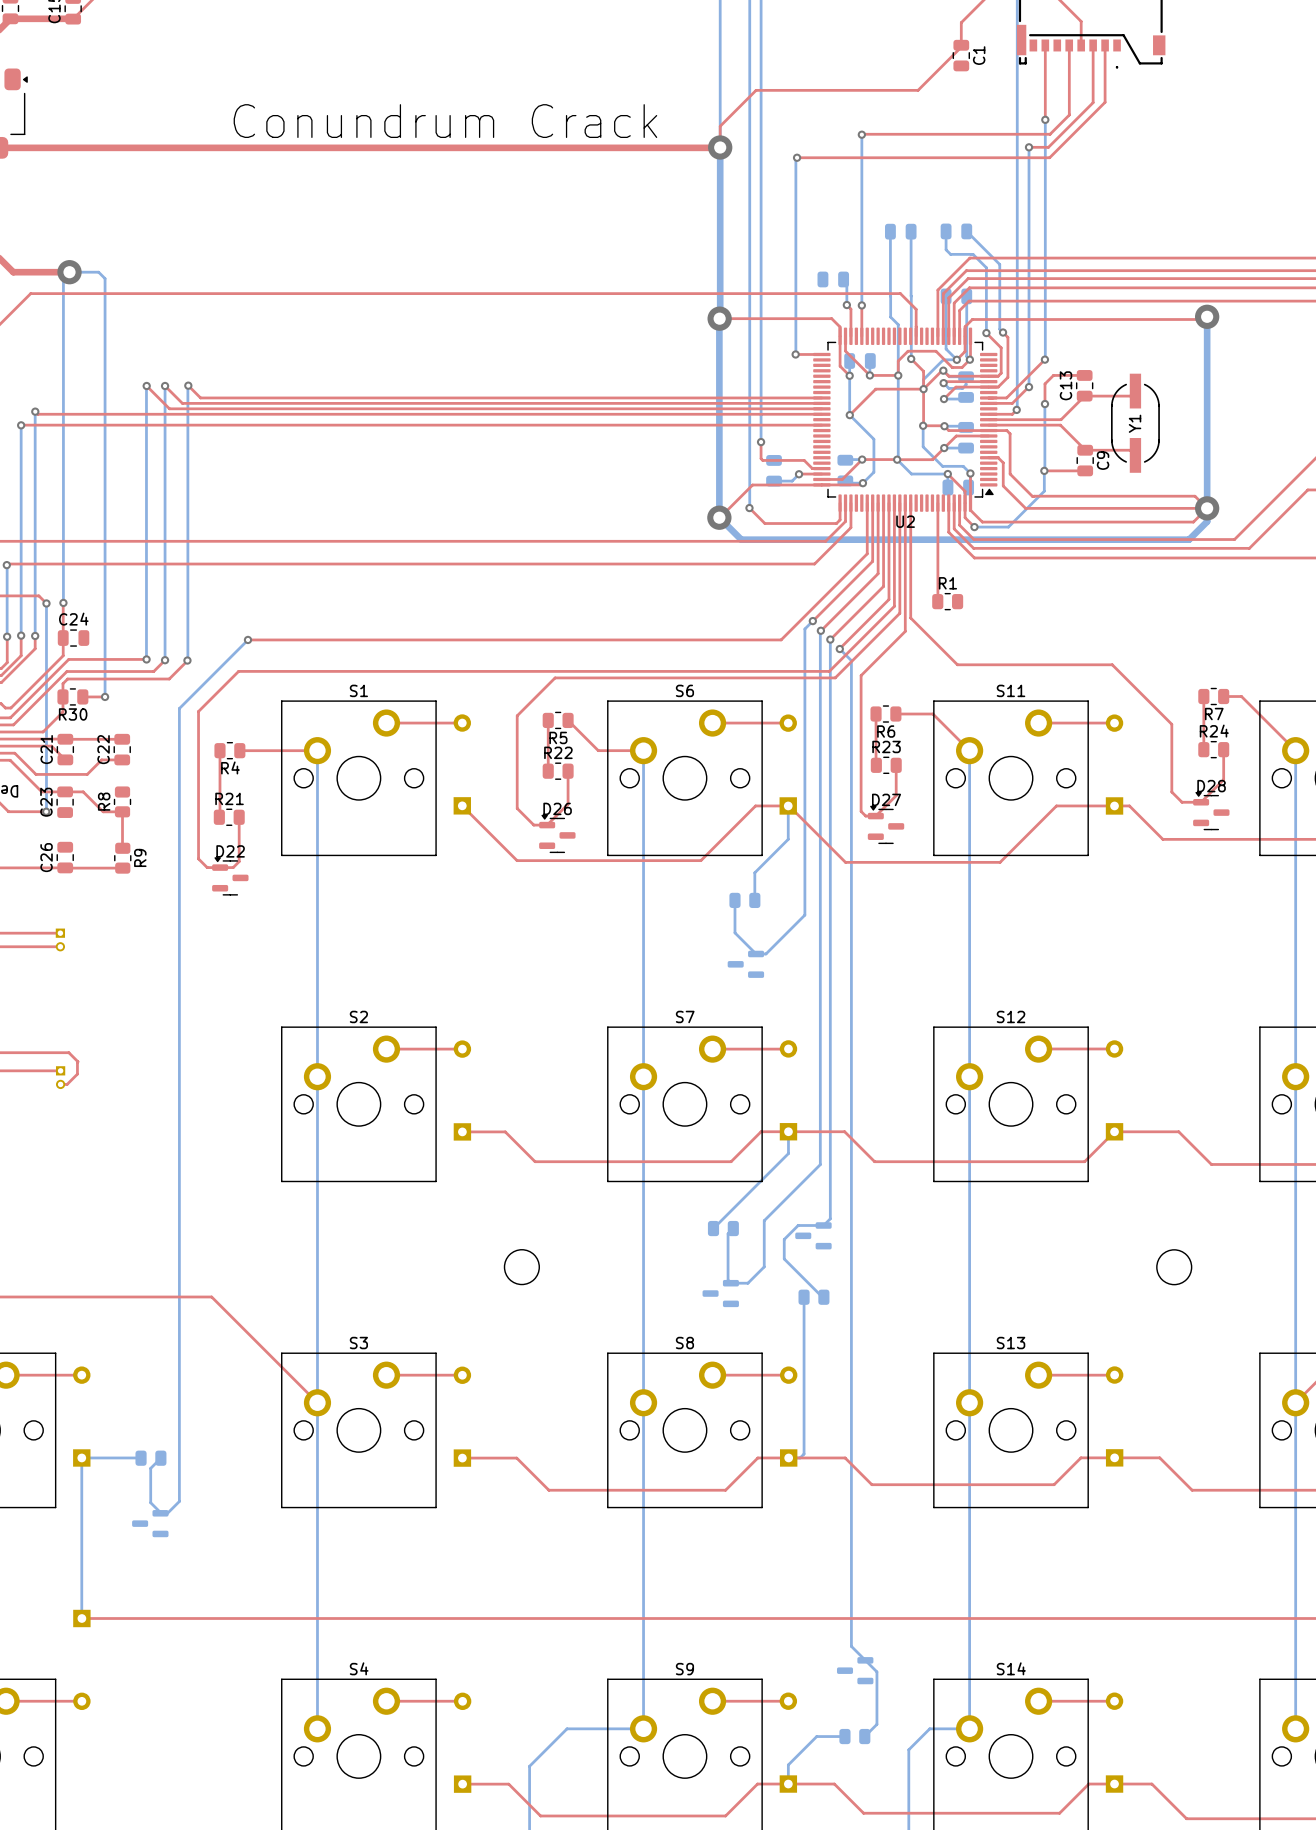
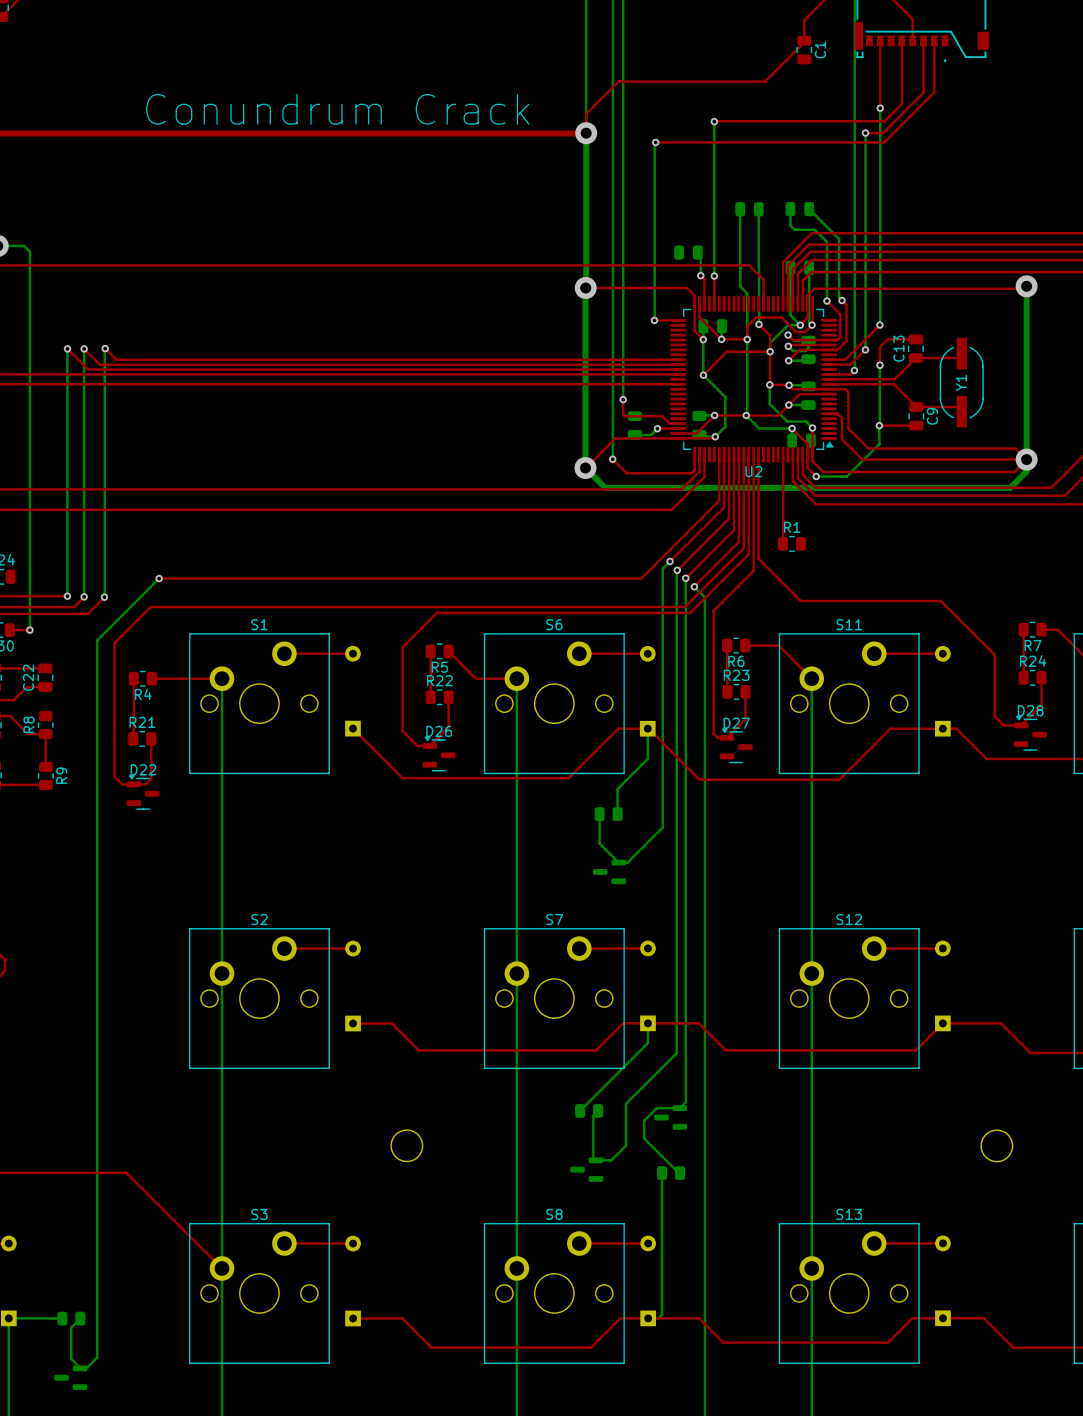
top track: (943, 370) (923, 389) -> none

